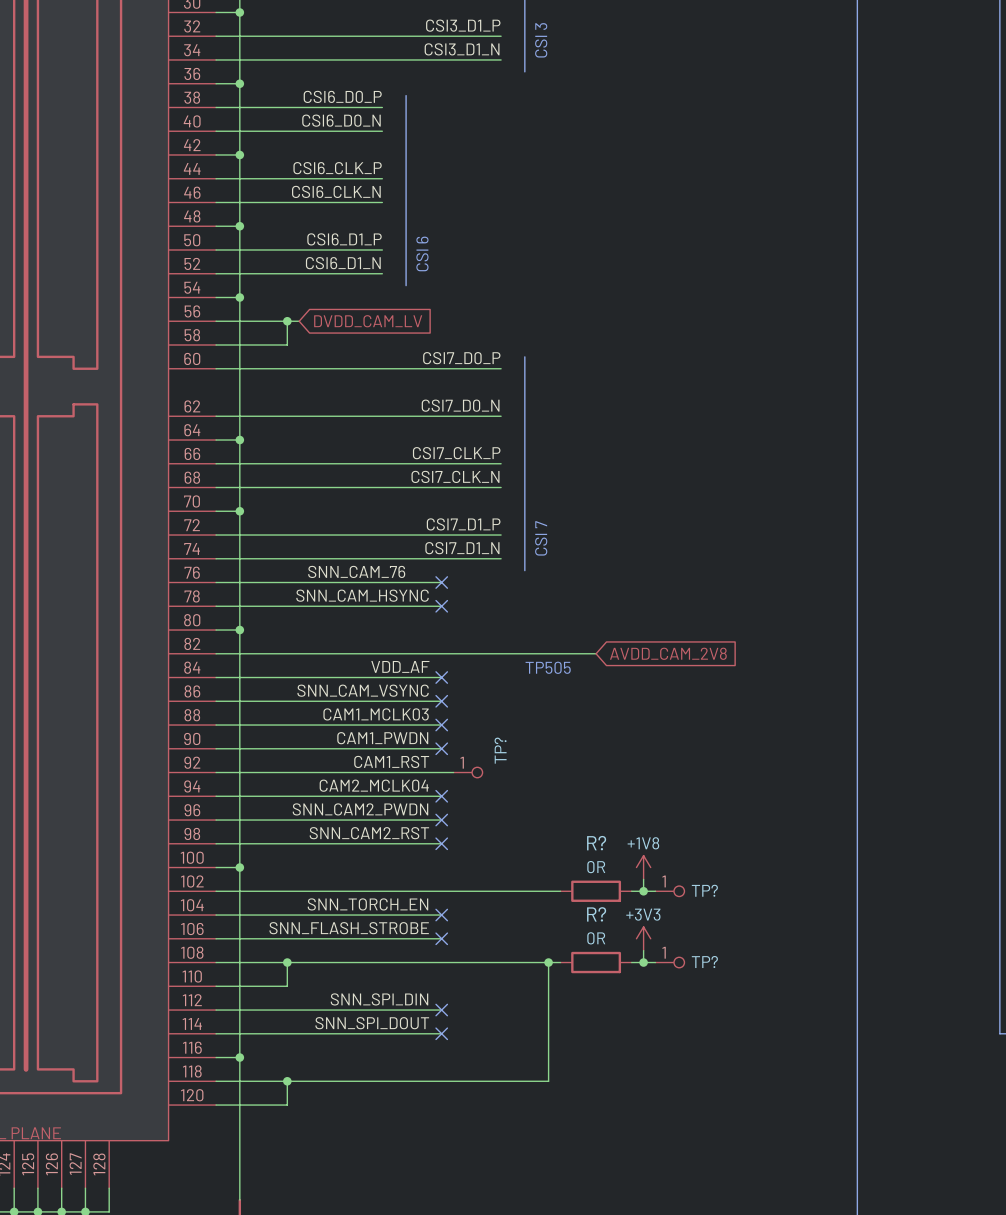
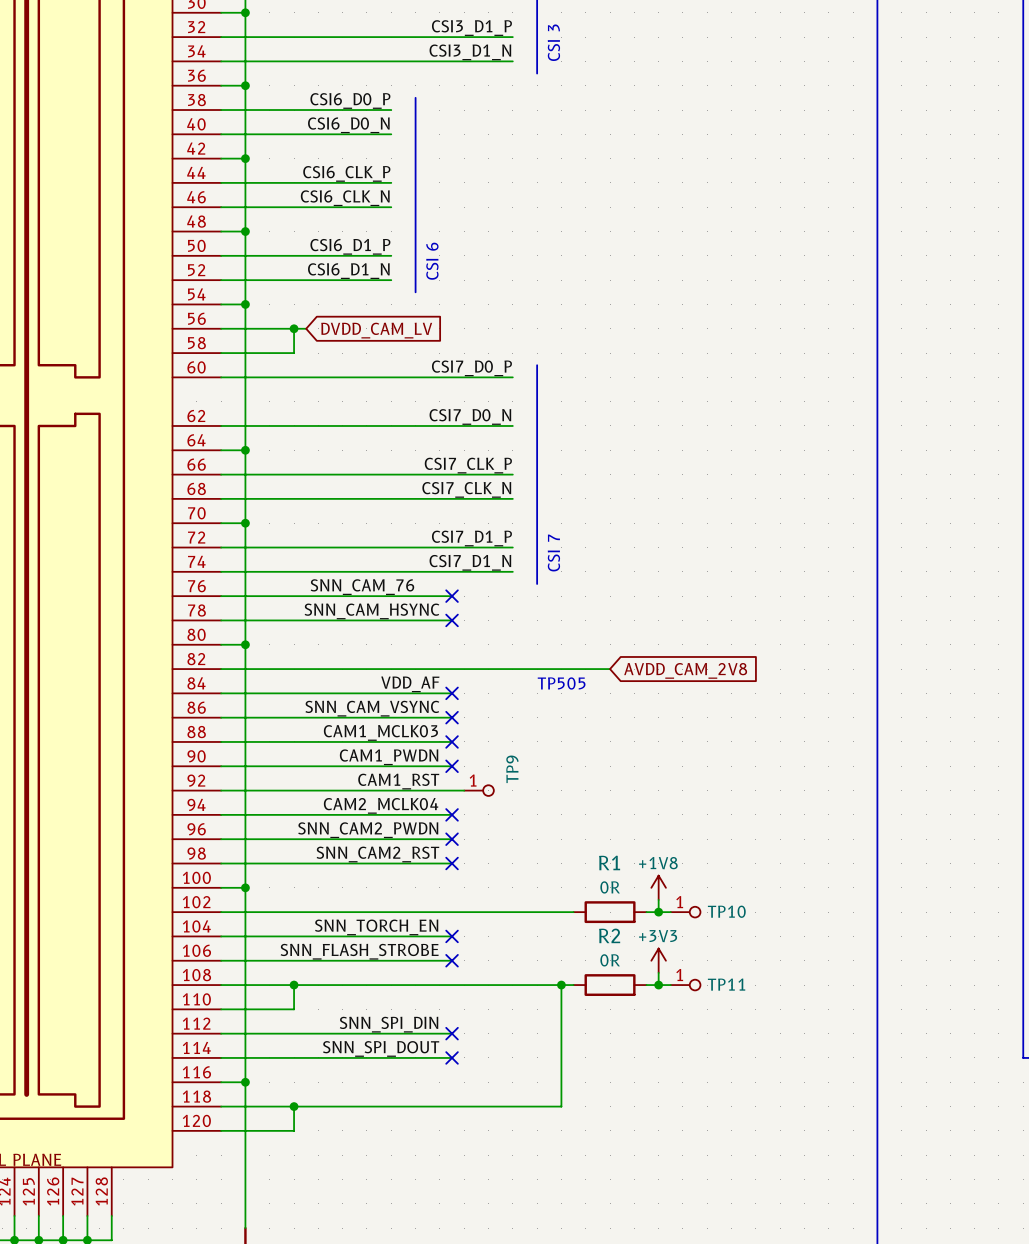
TP? name: TP? (500, 750) -> TP9 (512, 769)
R? name: R? (596, 843) -> R1 (609, 862)
TP? name: TP? (704, 890) -> TP10 (726, 911)
R? name: R? (596, 914) -> R2 (609, 935)
TP? name: TP? (704, 962) -> TP11 (726, 984)

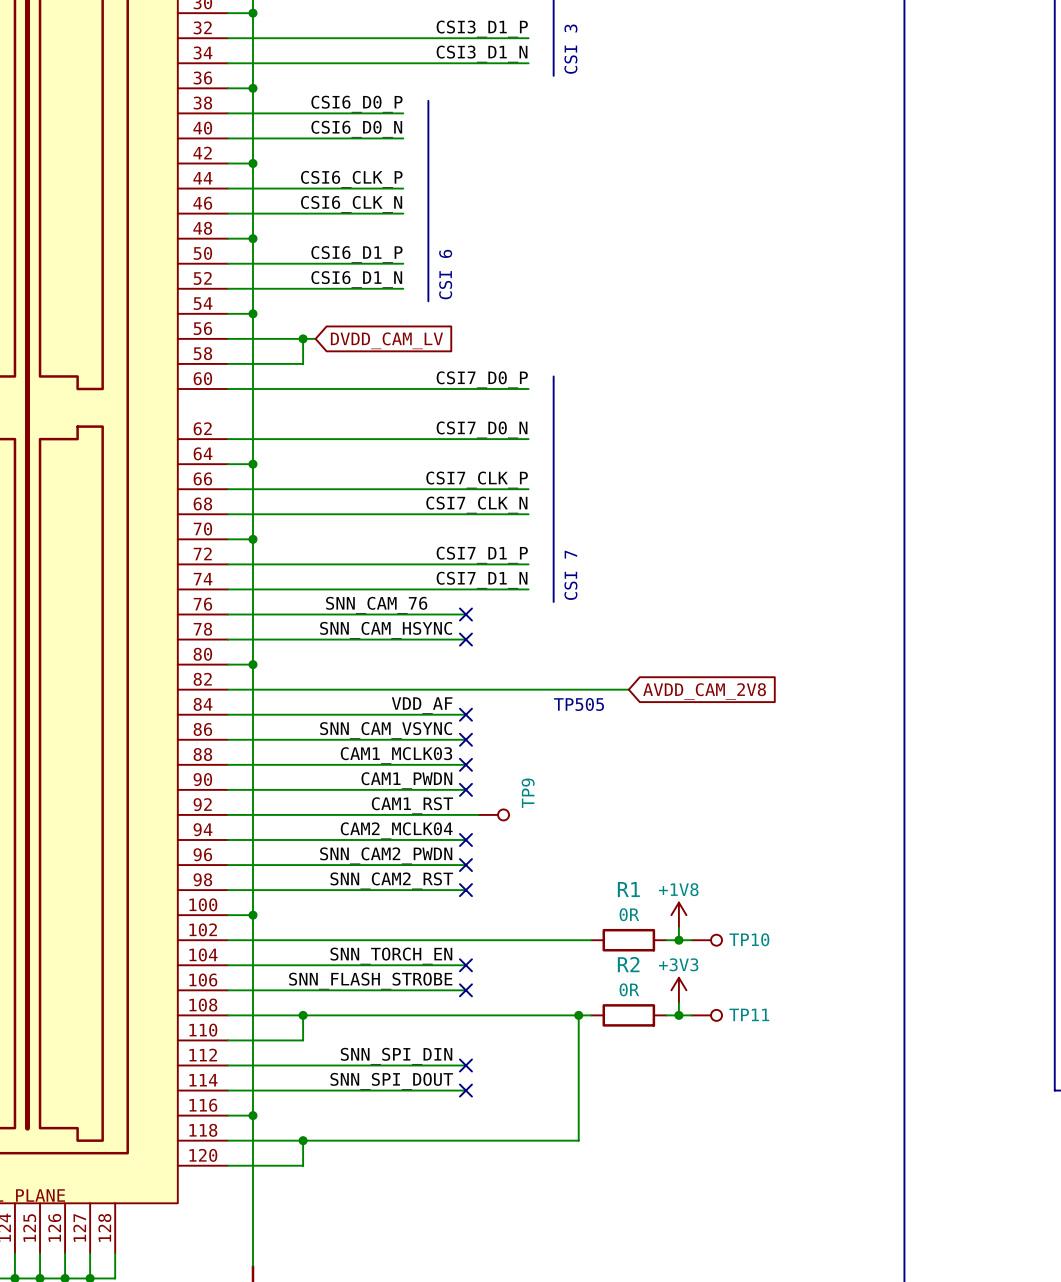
TP9 pin number: 1 (473, 780) -> none
TP10 pin number: 1 (679, 902) -> none
TP11 pin number: 1 (679, 975) -> none

